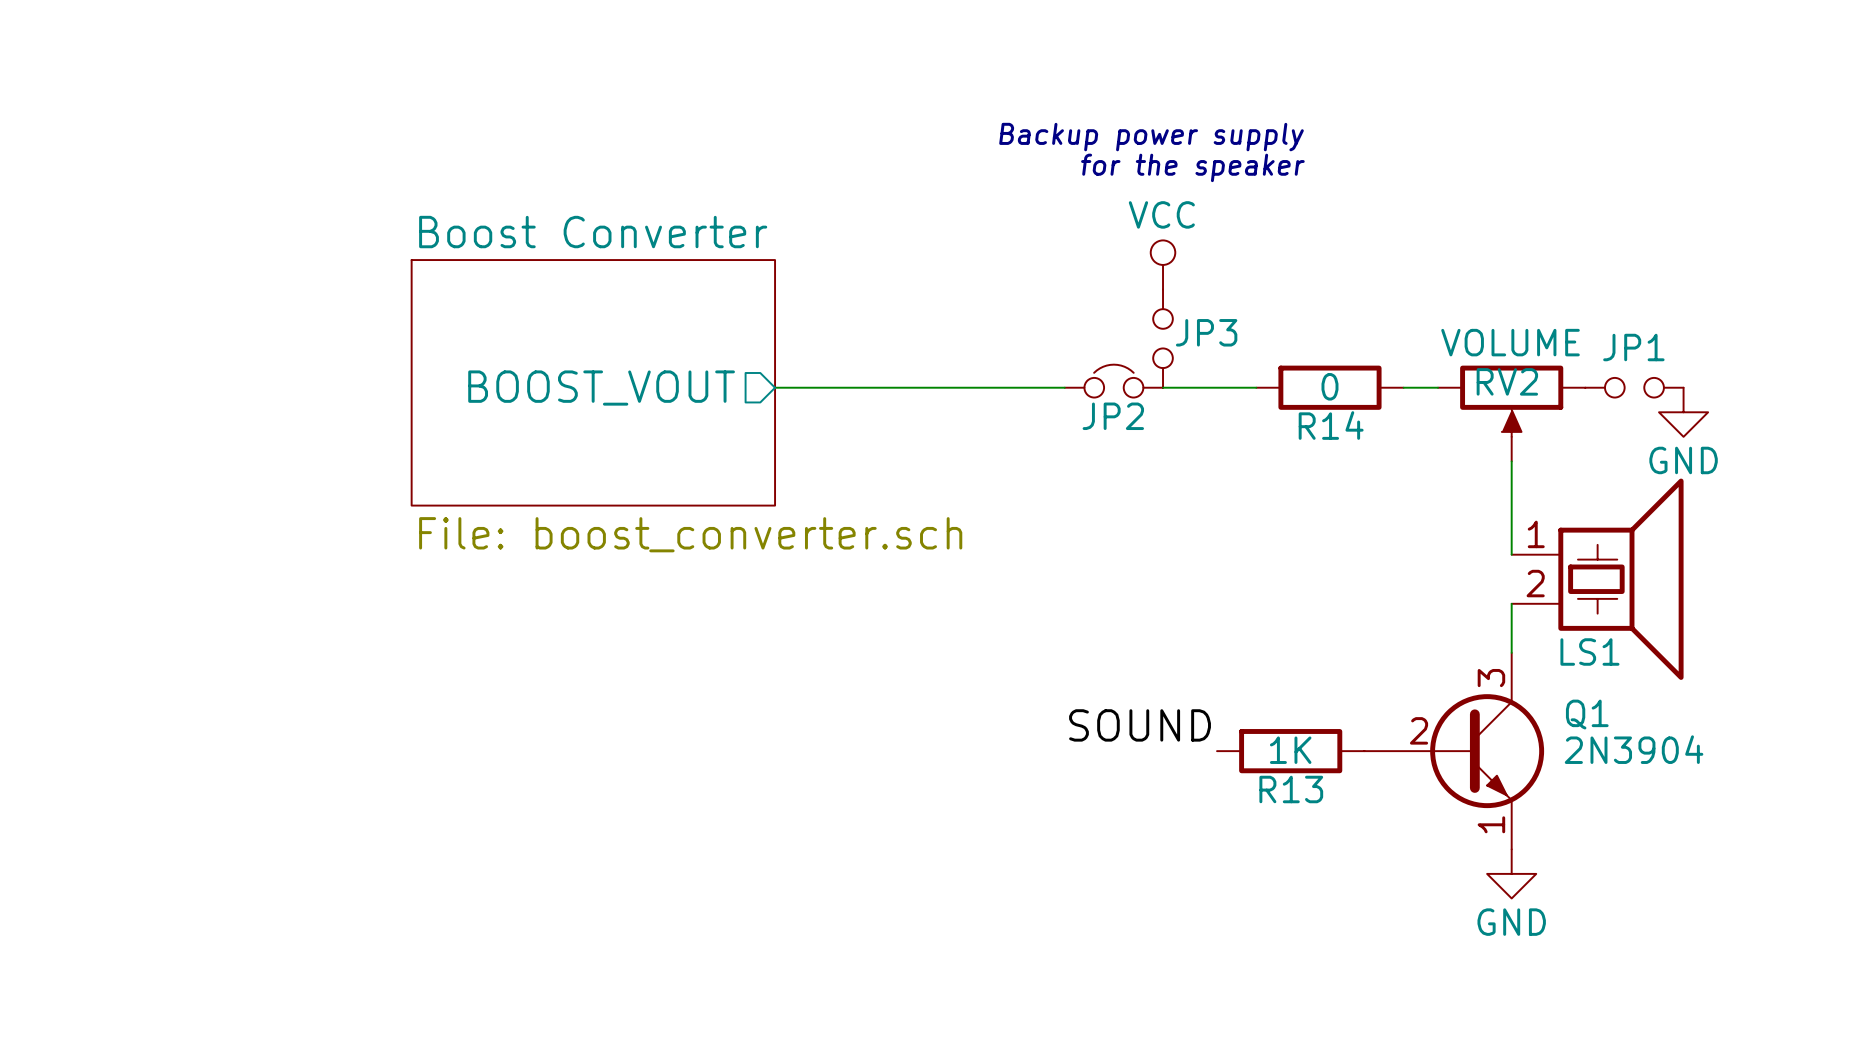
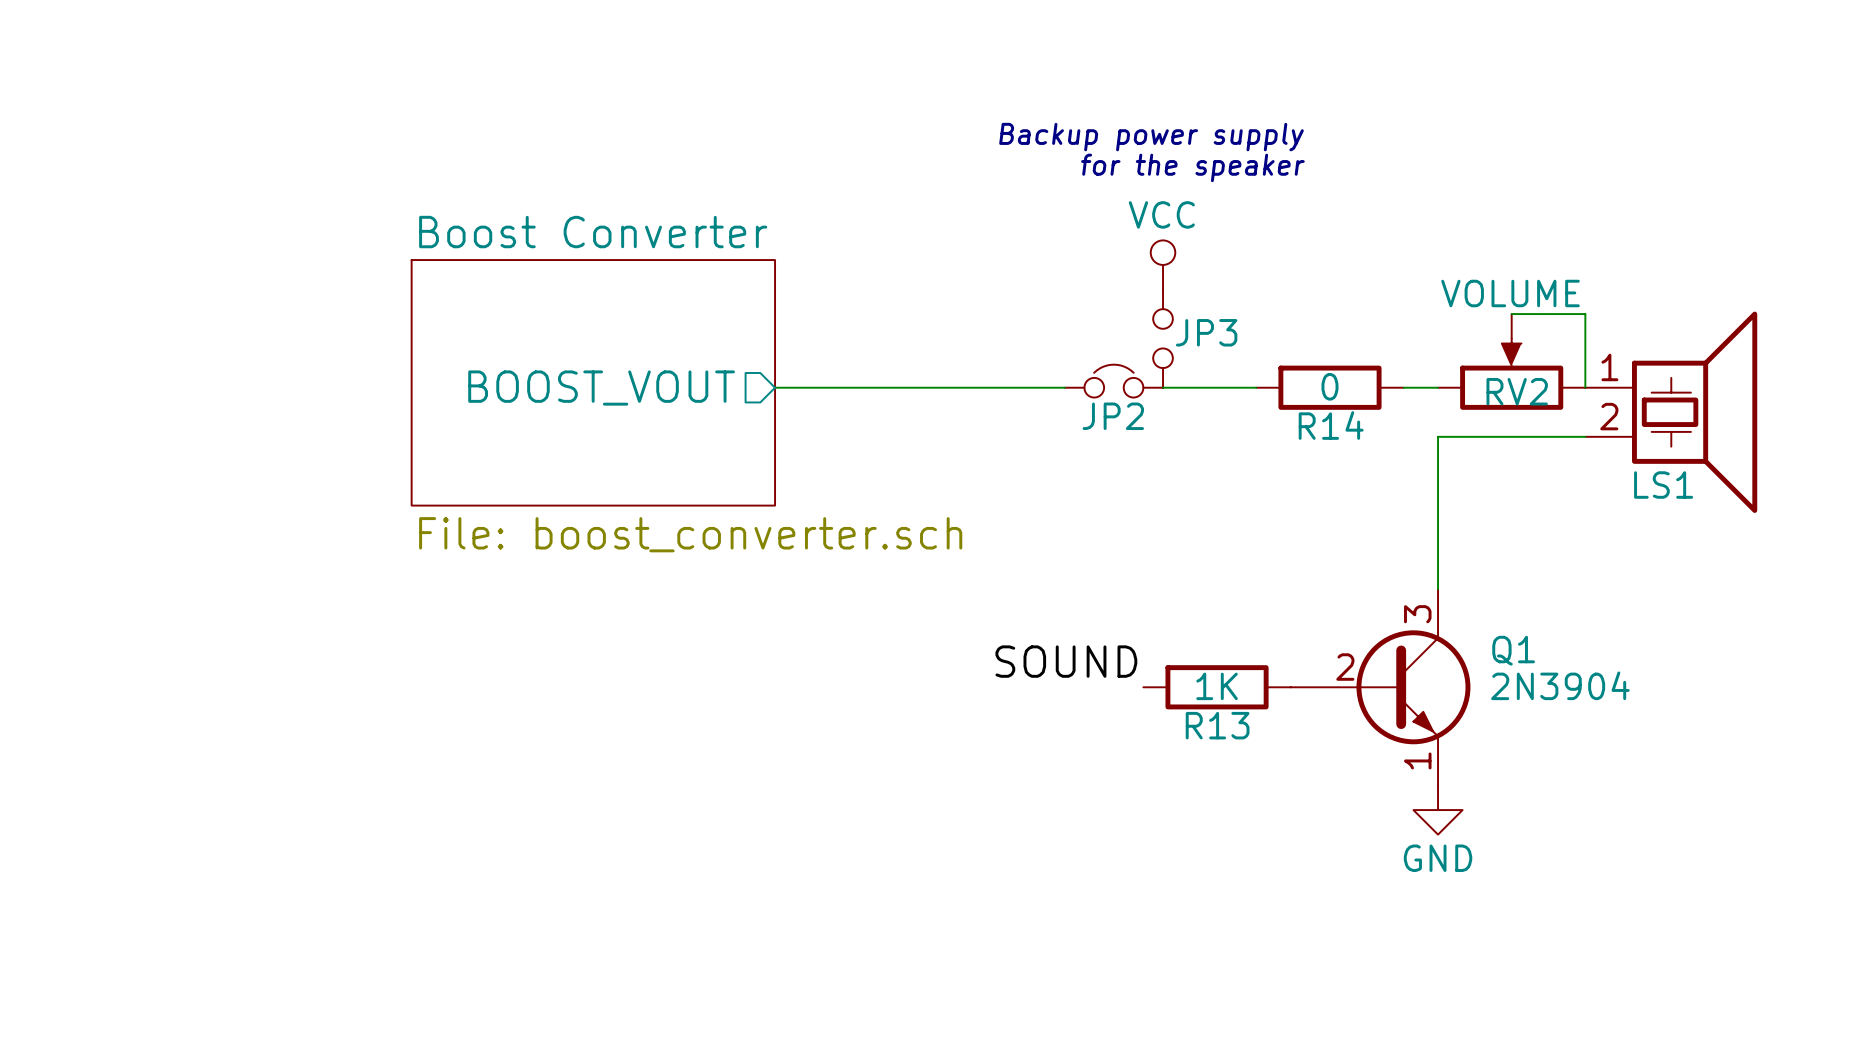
wire: none -> (1511, 314) (1585, 314) (1585, 387)
JP1: (1634, 387) -> none
RV2 rotation: 0° (1511, 401) -> 180° (1511, 374)
power symbol: GND (1683, 412) -> none
wire: none -> (1585, 436) (1438, 436) (1438, 589)
wire: (1511, 461) (1511, 554) -> none
LS1 position: (1597, 579) -> (1671, 412)
wire: (1511, 603) (1511, 652) -> none
label position: SOUND (1140, 725) -> SOUND (1066, 661)
R13 position: (1290, 751) -> (1217, 687)
Q1 position: (1454, 751) -> (1380, 687)
power symbol position: GND (1511, 873) -> GND (1438, 810)

